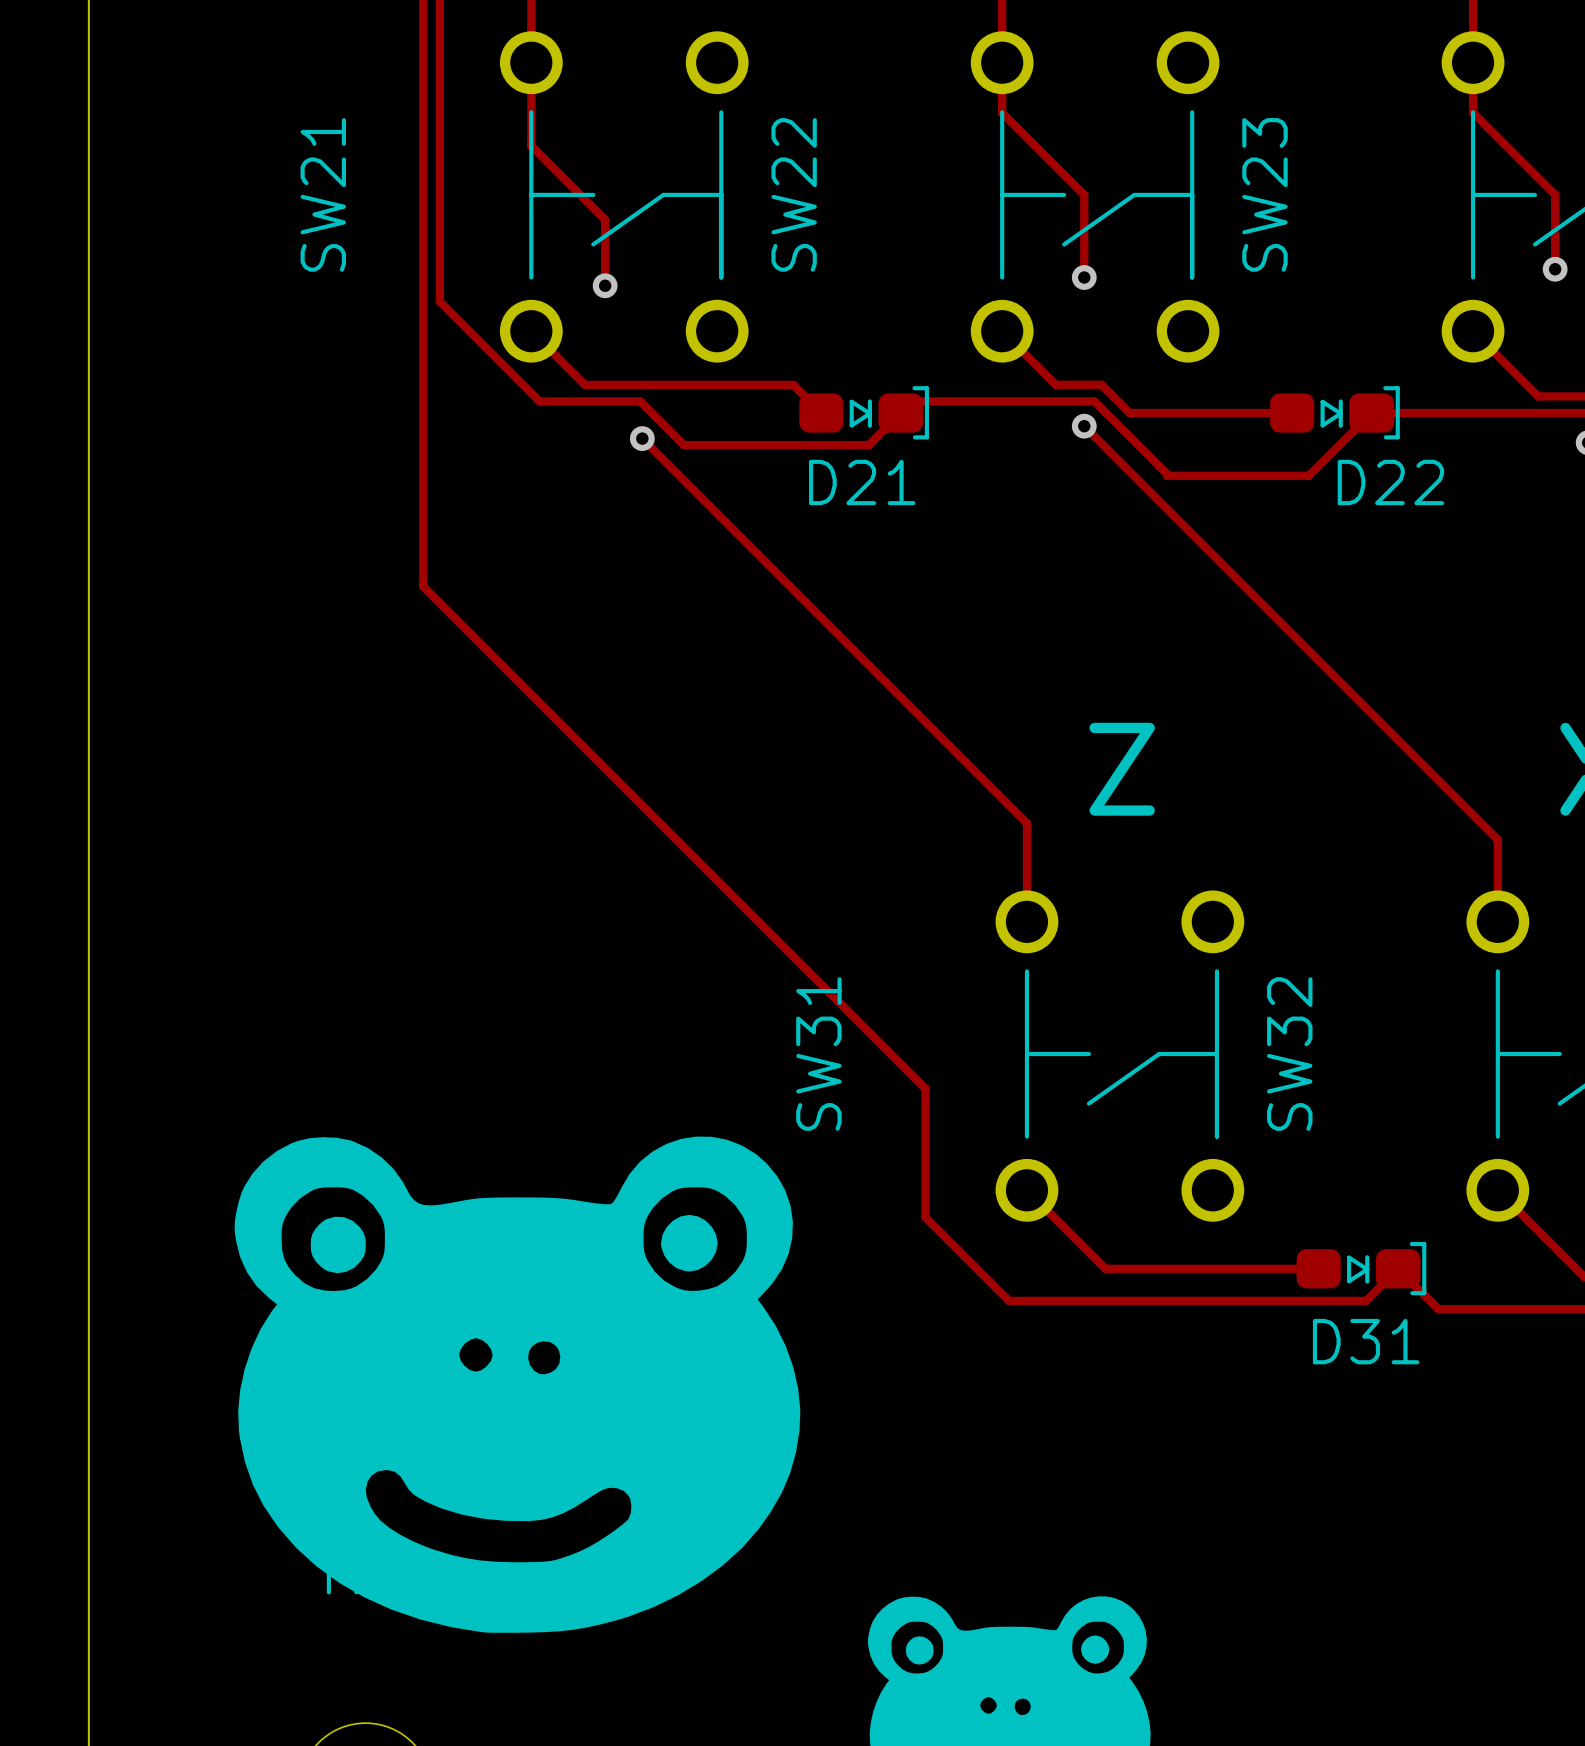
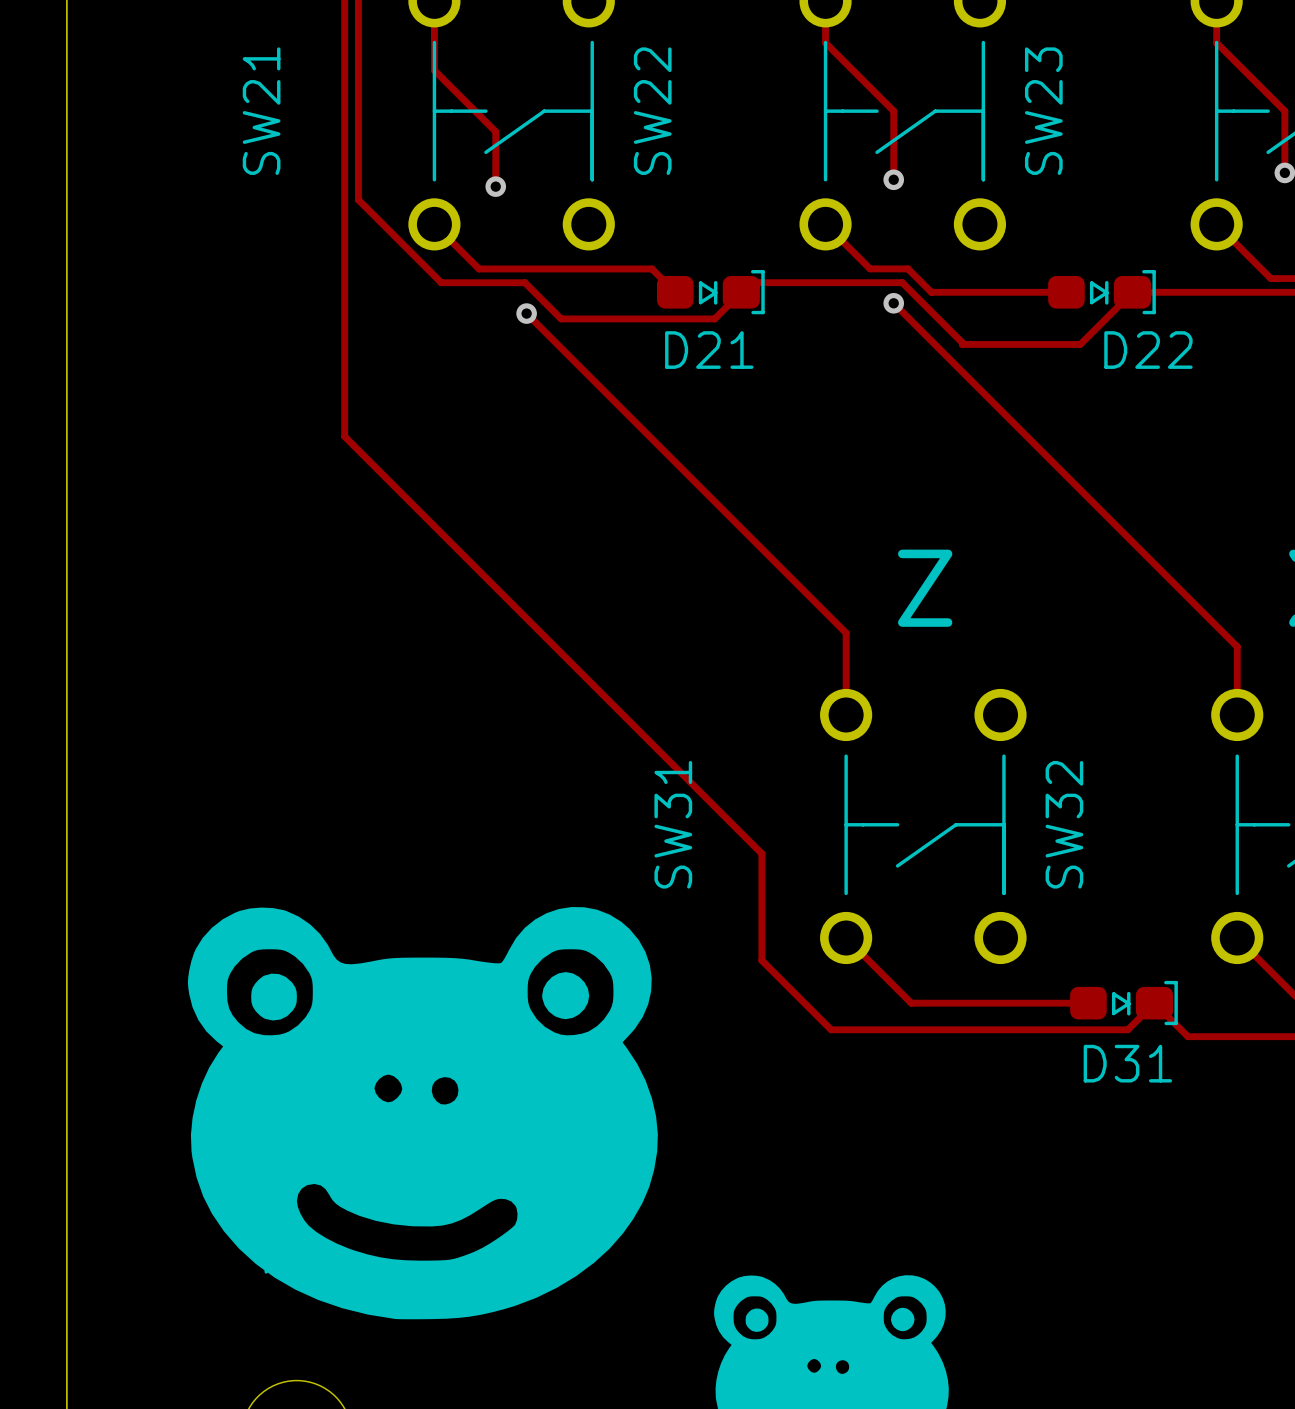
drawing position: (517, 1384) -> (422, 1113)

